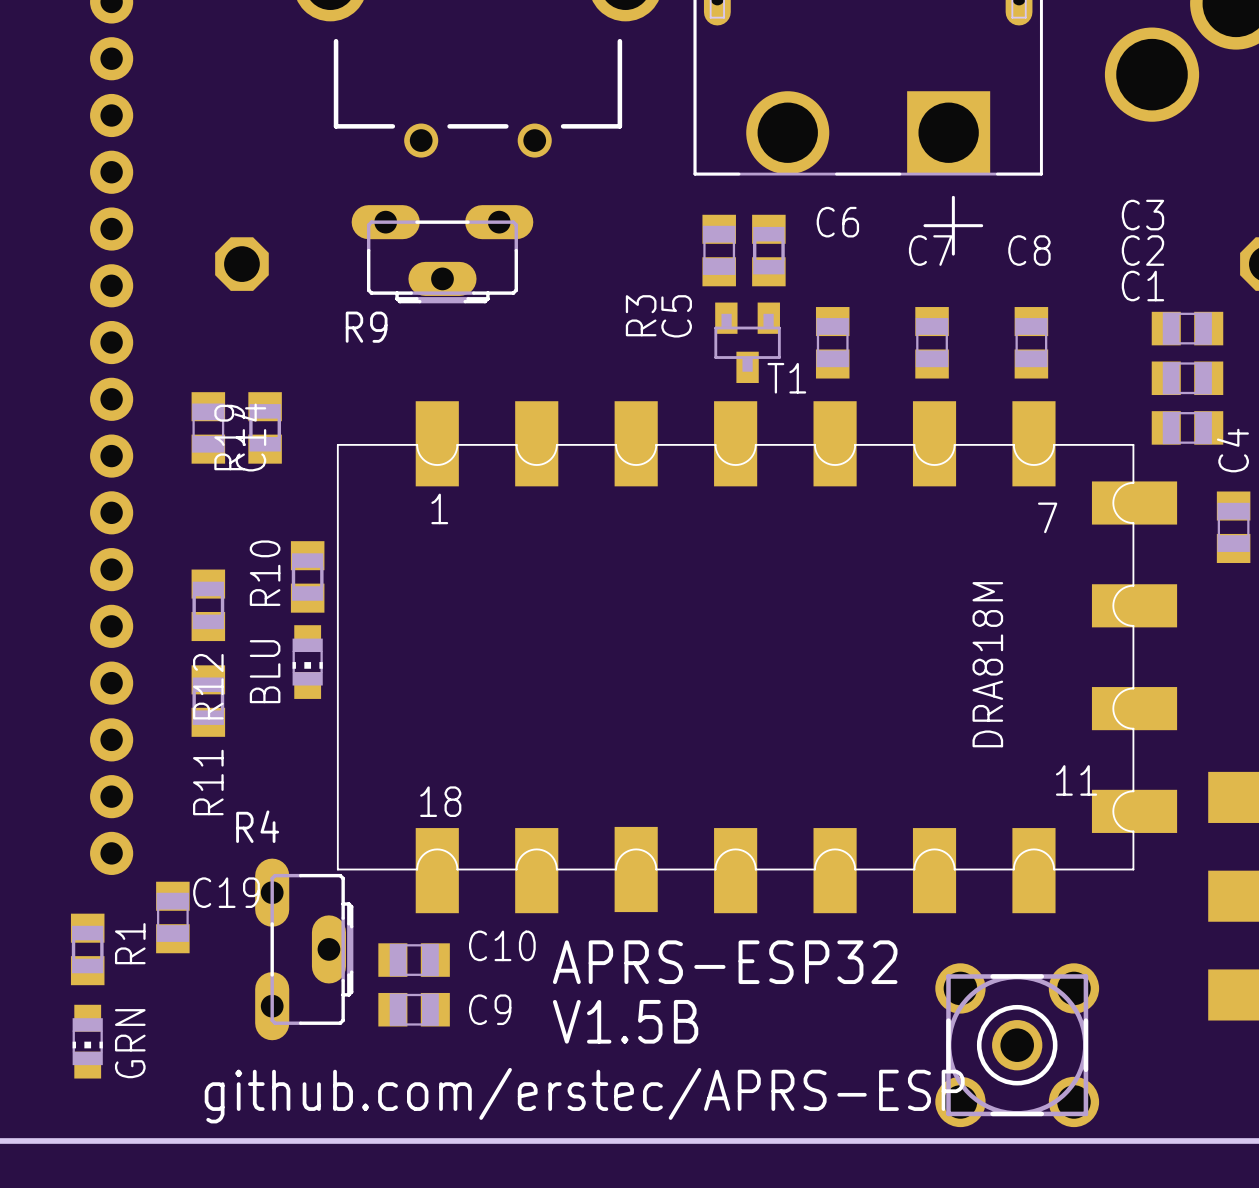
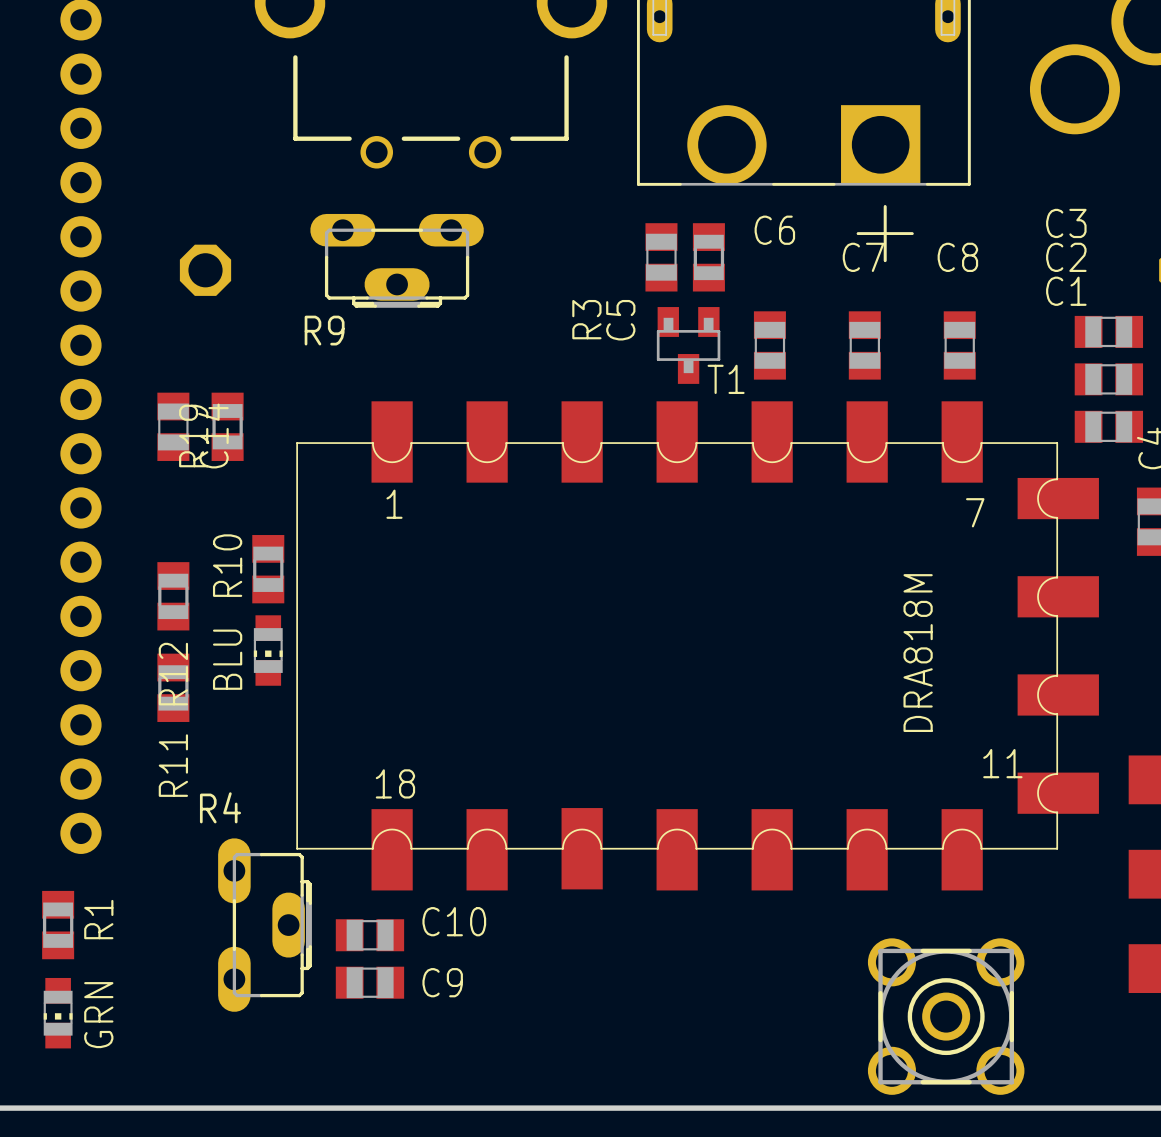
C19: (172, 917) -> none
text: APRS-ESP32 (725, 962) -> none
text: V1.5B (625, 1021) -> none
text: github.com/erstec/APRS-ESP (584, 1095) -> none

